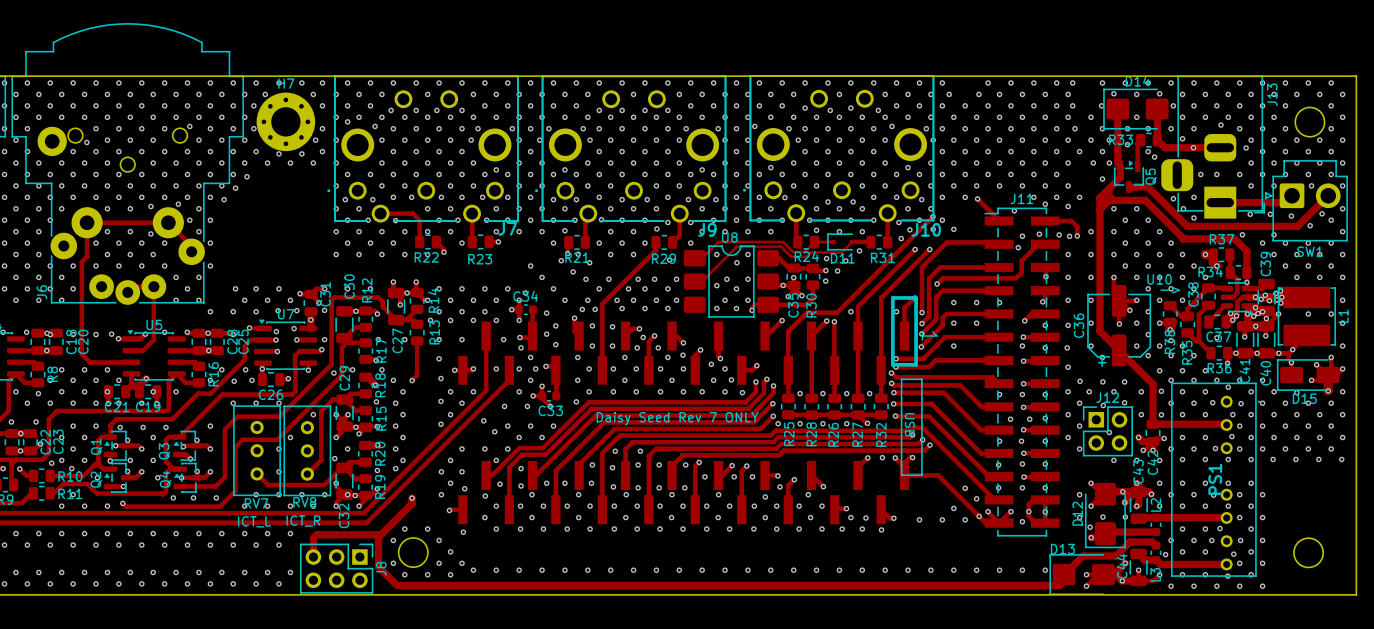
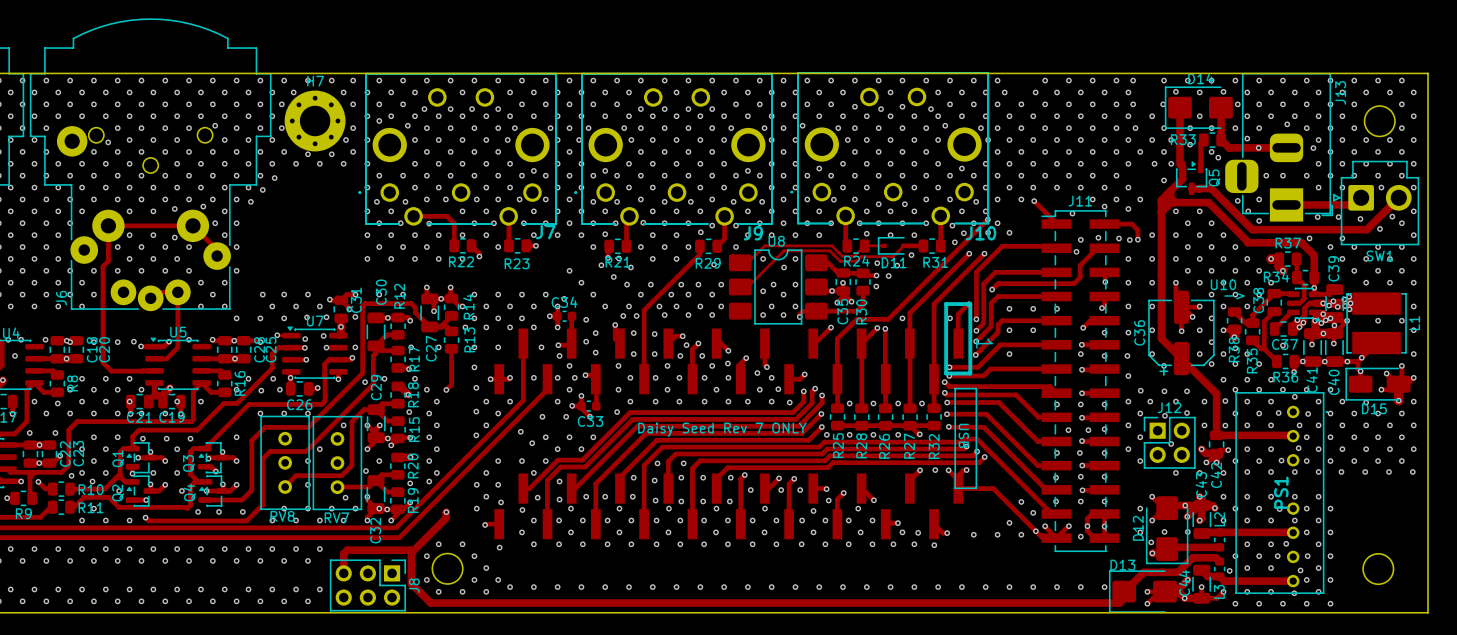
track: (321, 453) (321, 460) (307, 474) -> (351, 465) (341, 475) (295, 475) (284, 487)
track: (344, 467) (341, 467) (324, 485) (268, 485) (257, 473) -> (375, 480) (369, 487) (336, 487)
via: none -> (345, 497)
RV8 name: RV8 (304, 502) -> RV7 (336, 517)
RV7 name: RV7 (256, 503) -> RV8 (282, 516)
RV7 text: ICT_L (254, 521) -> none
RV8 text: ICT_R (303, 521) -> none

